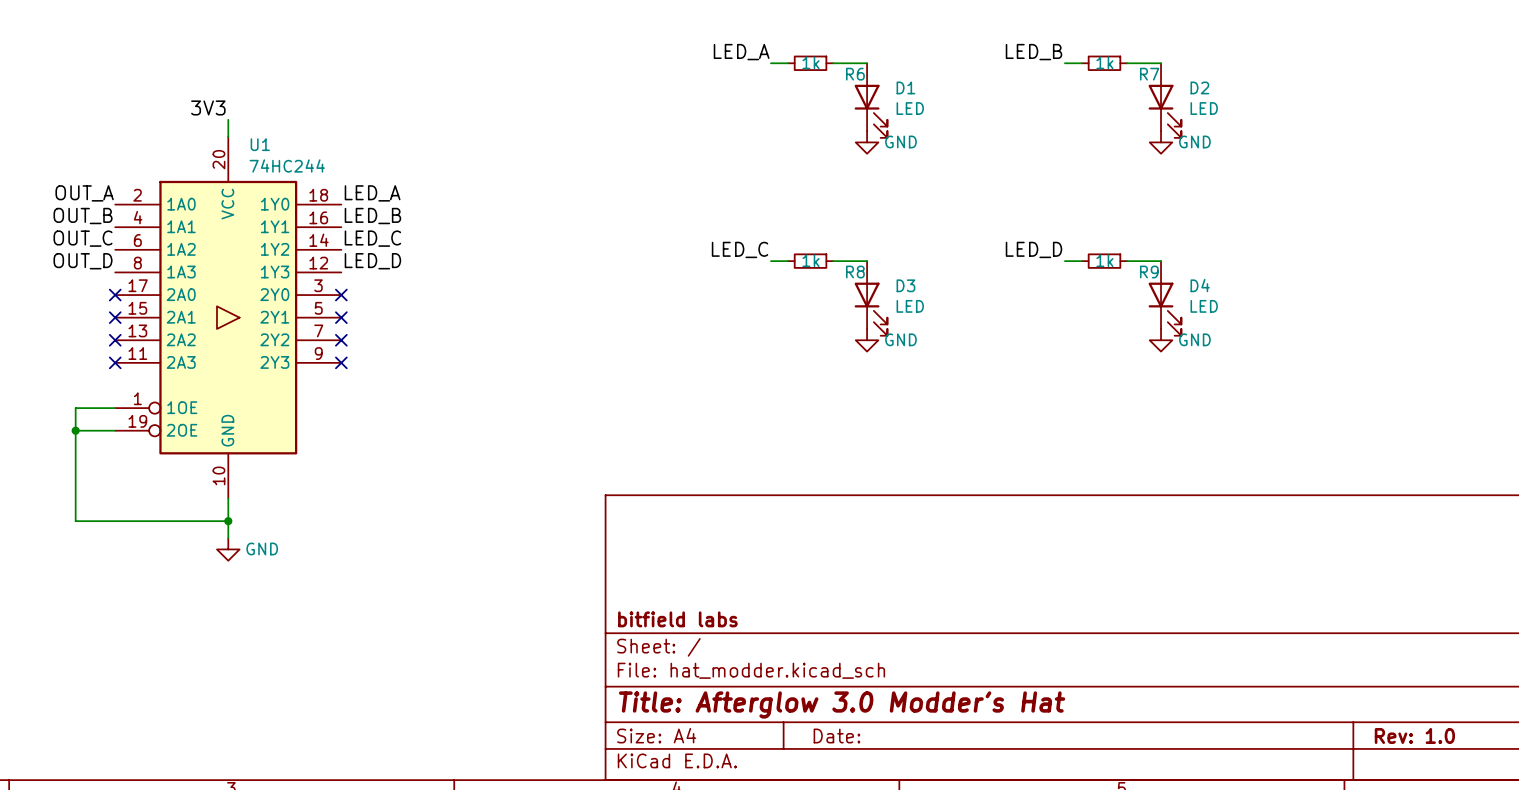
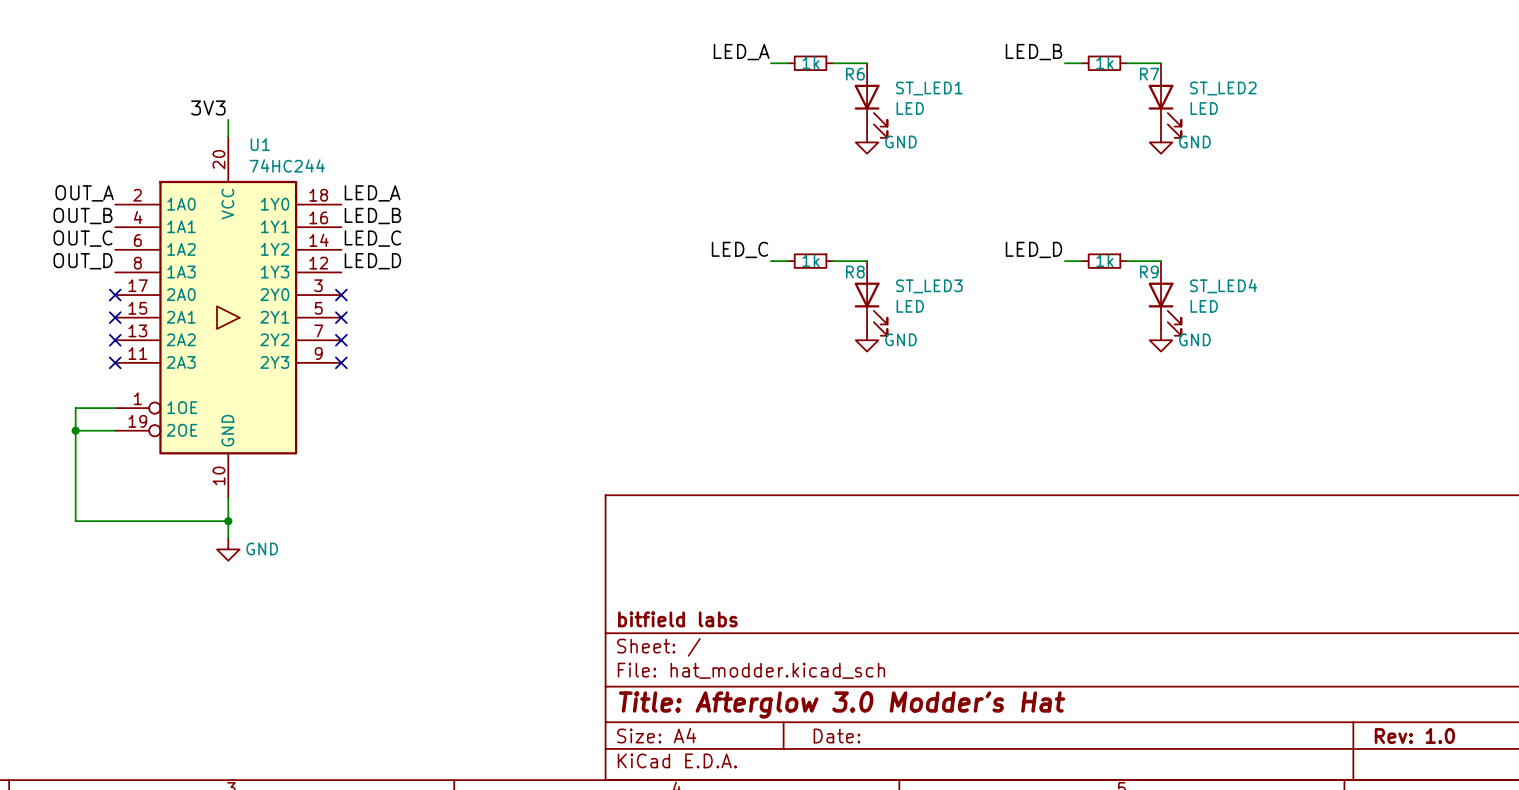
D1 name: D1 (905, 87) -> ST_LED1 (929, 88)
D2 name: D2 (1199, 87) -> ST_LED2 (1223, 88)
D3 name: D3 (905, 285) -> ST_LED3 (929, 286)
D4 name: D4 (1200, 285) -> ST_LED4 (1223, 286)

